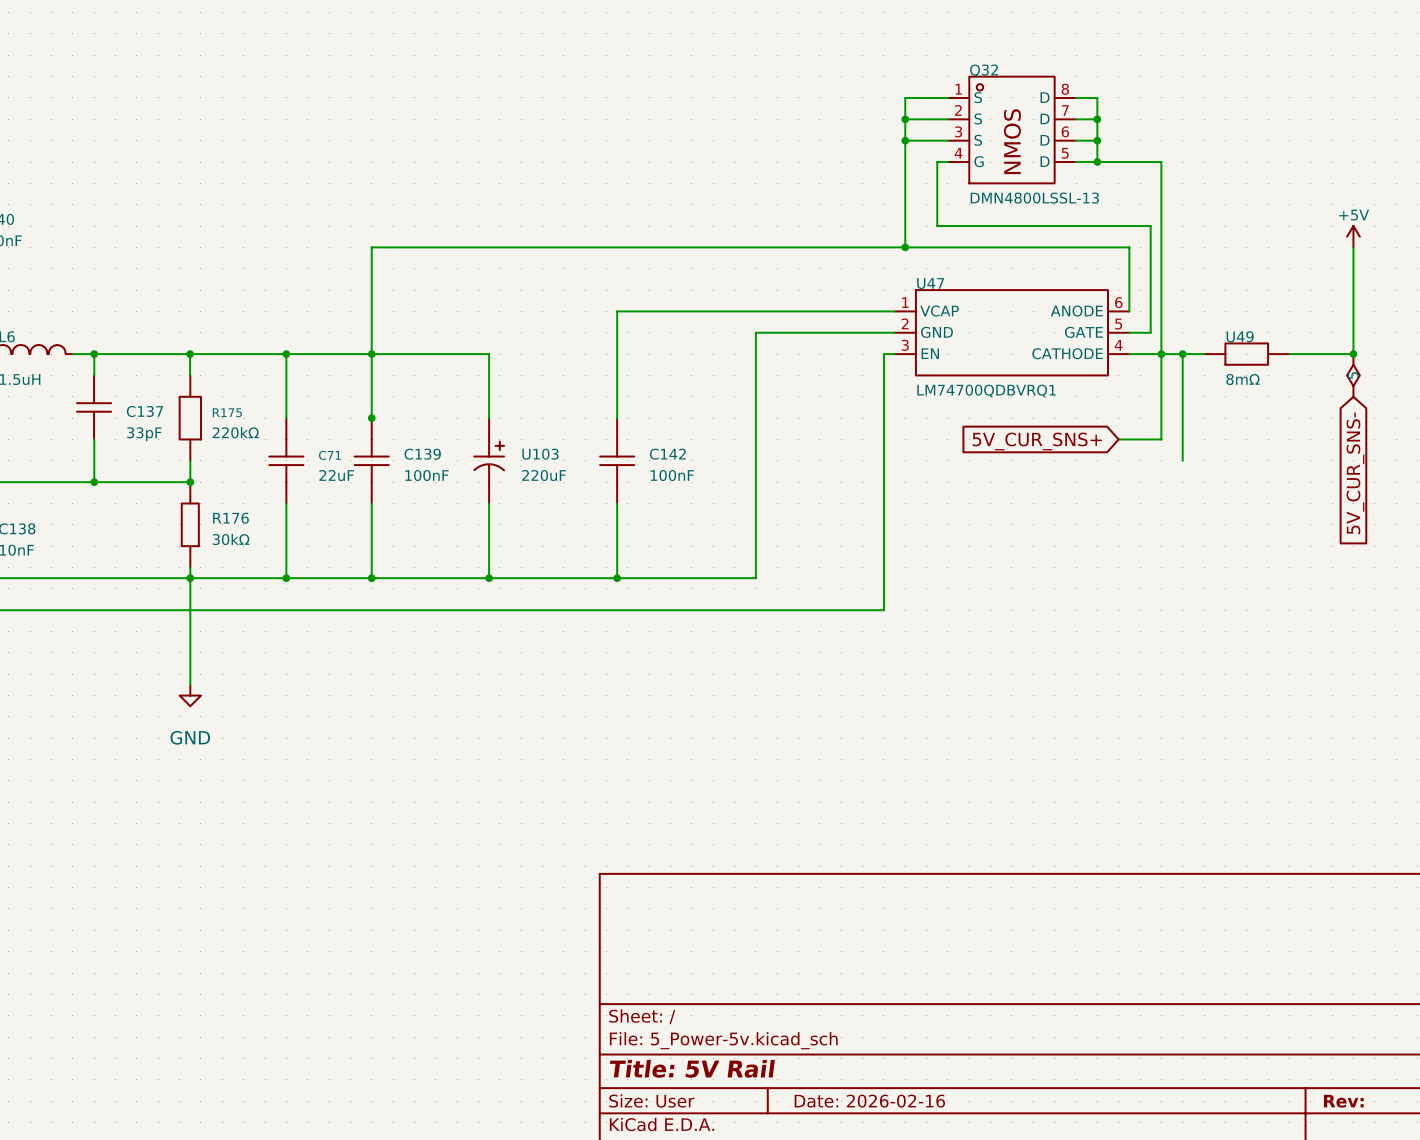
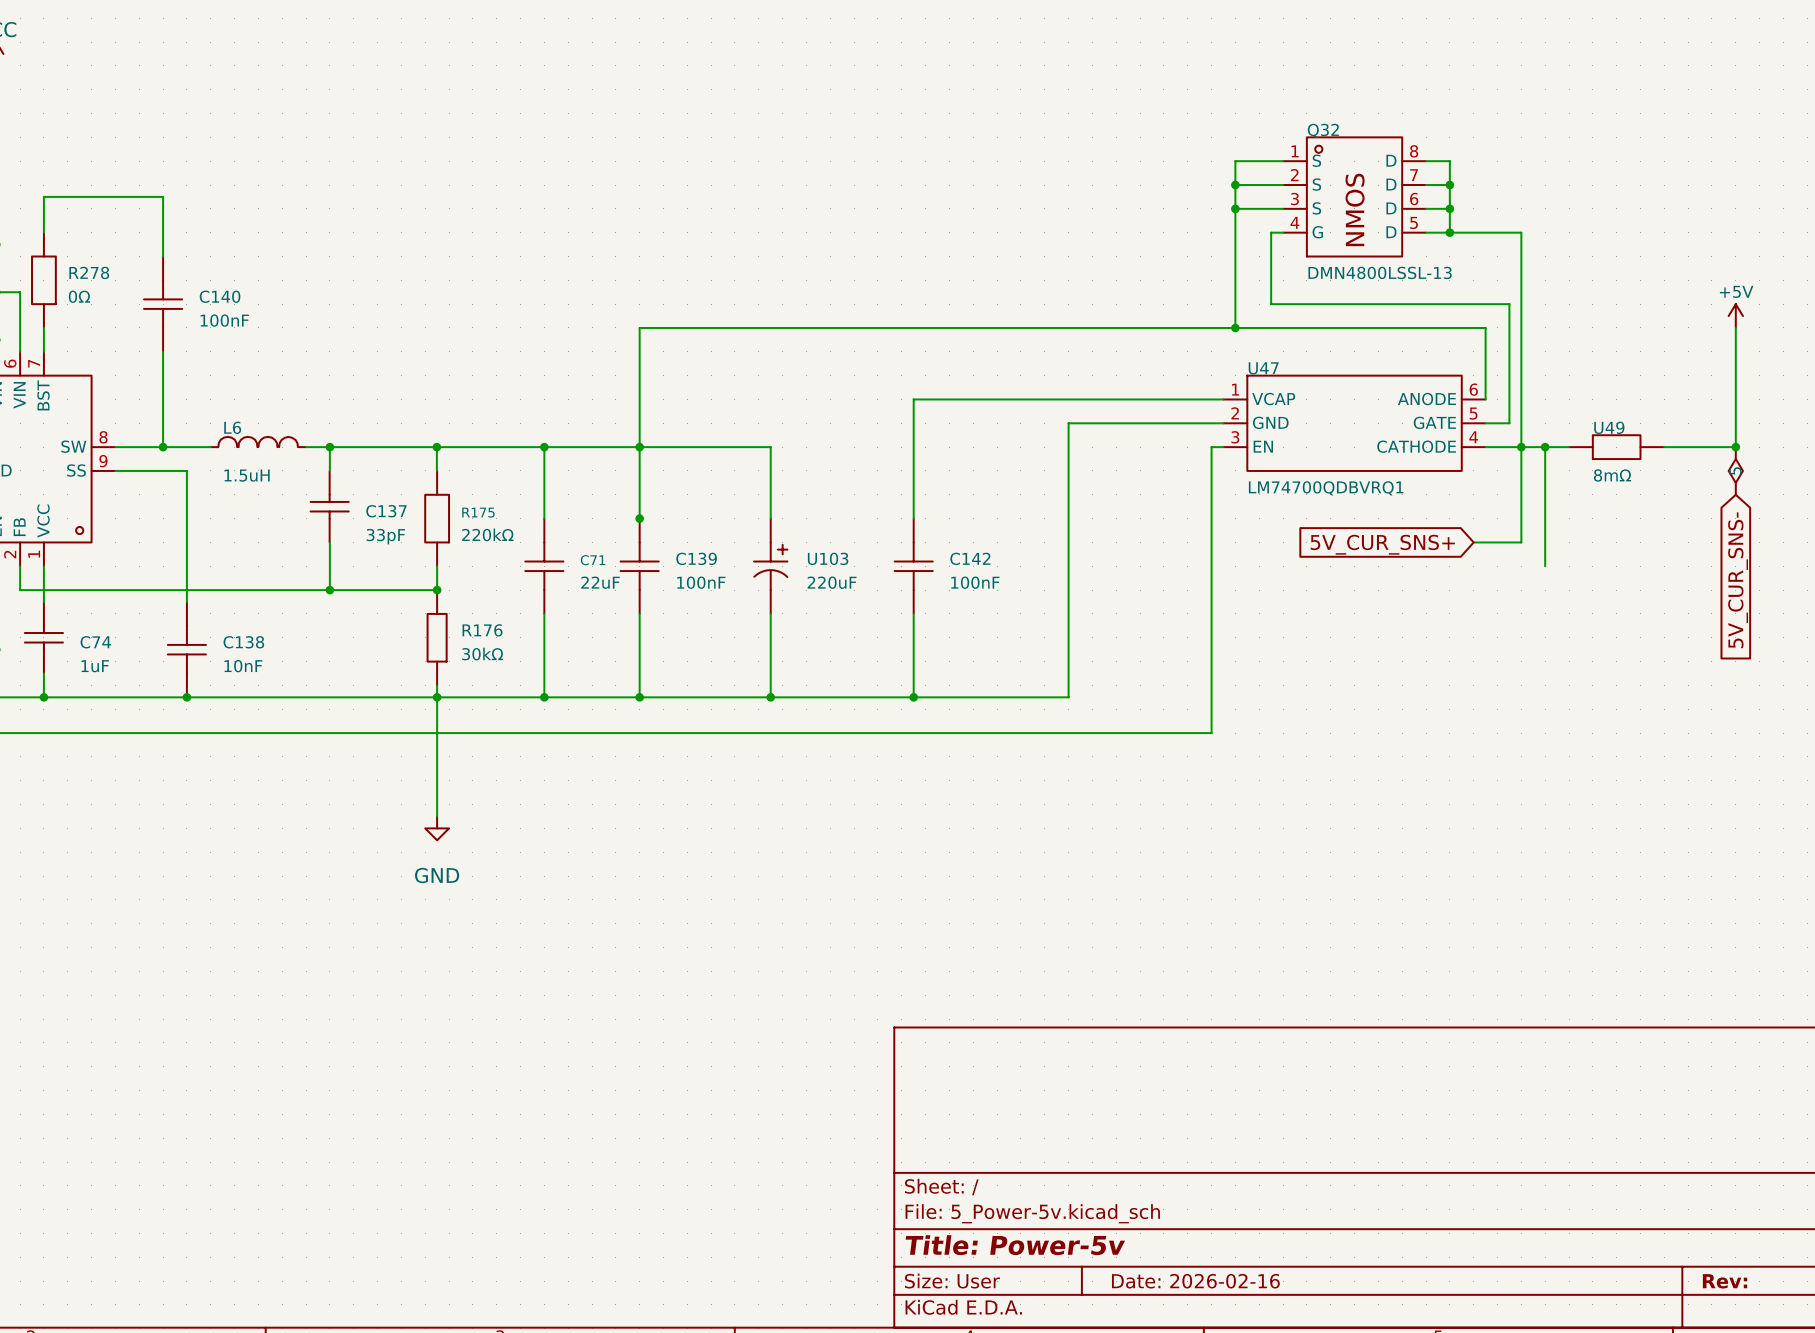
title block: Title: 5V Rail (692, 1068) -> Title: Power-5v (1015, 1245)

